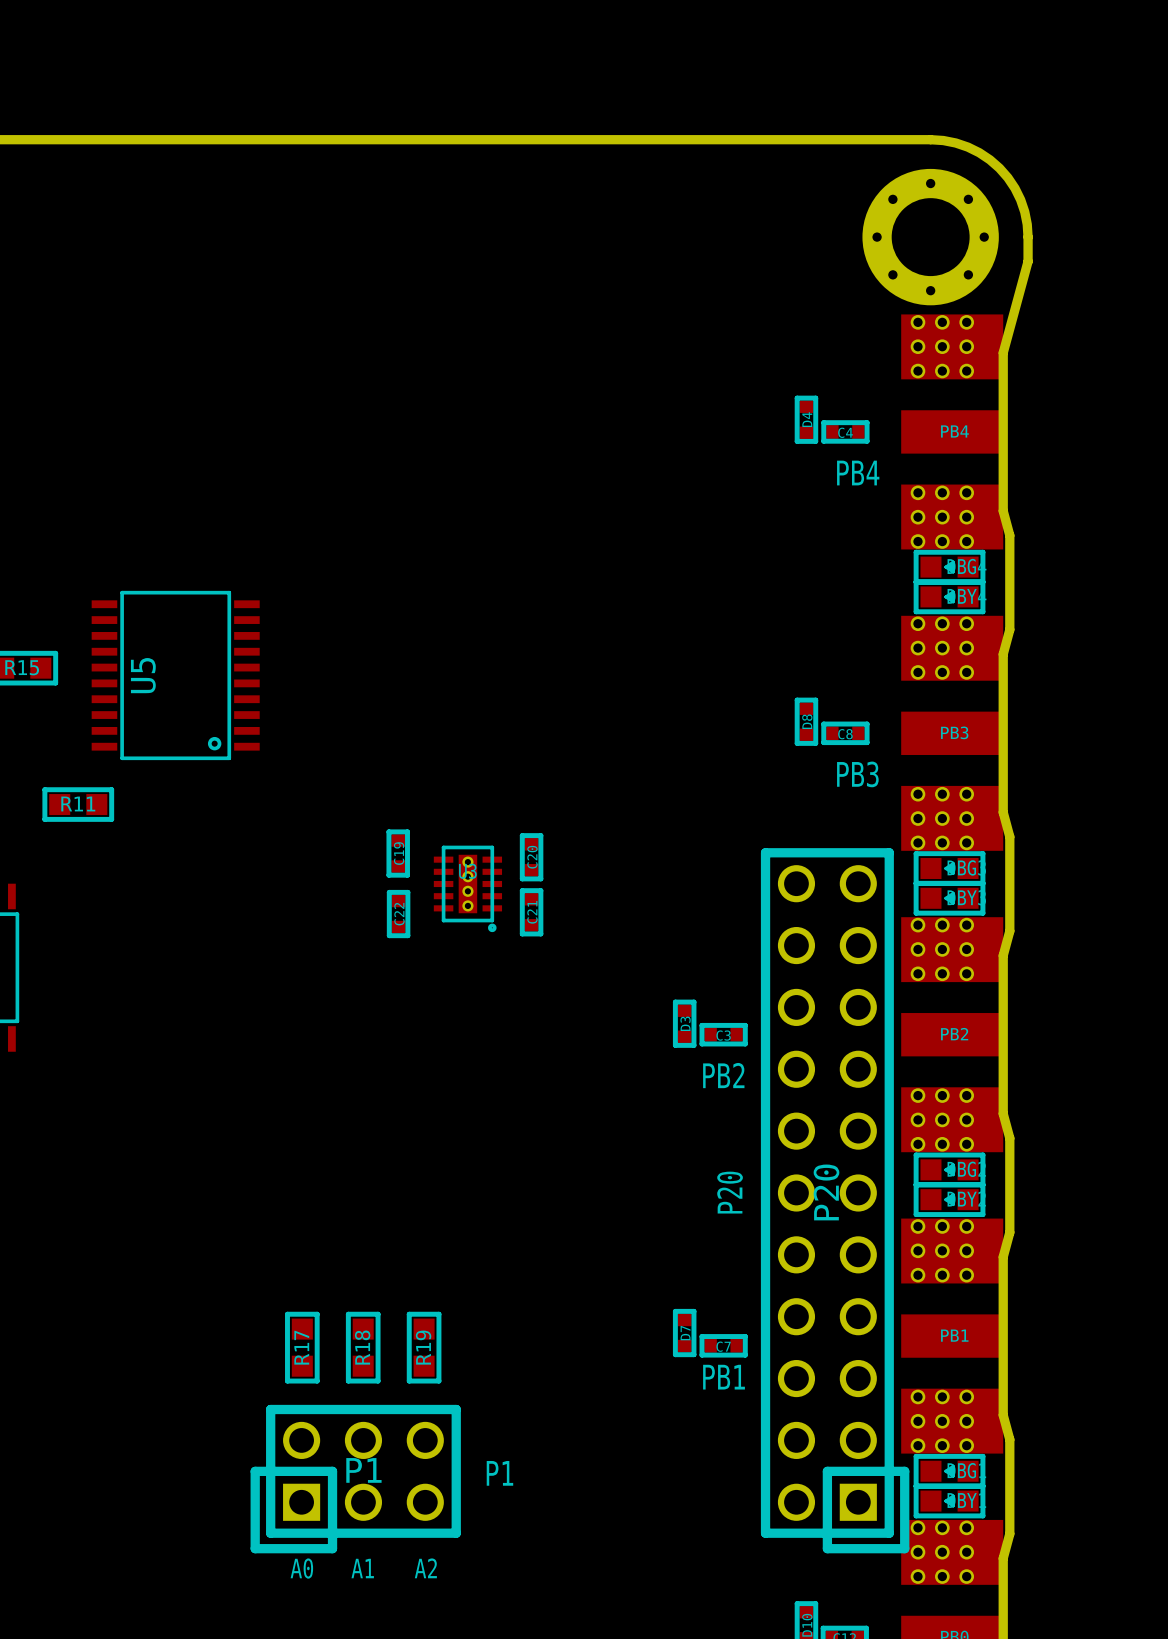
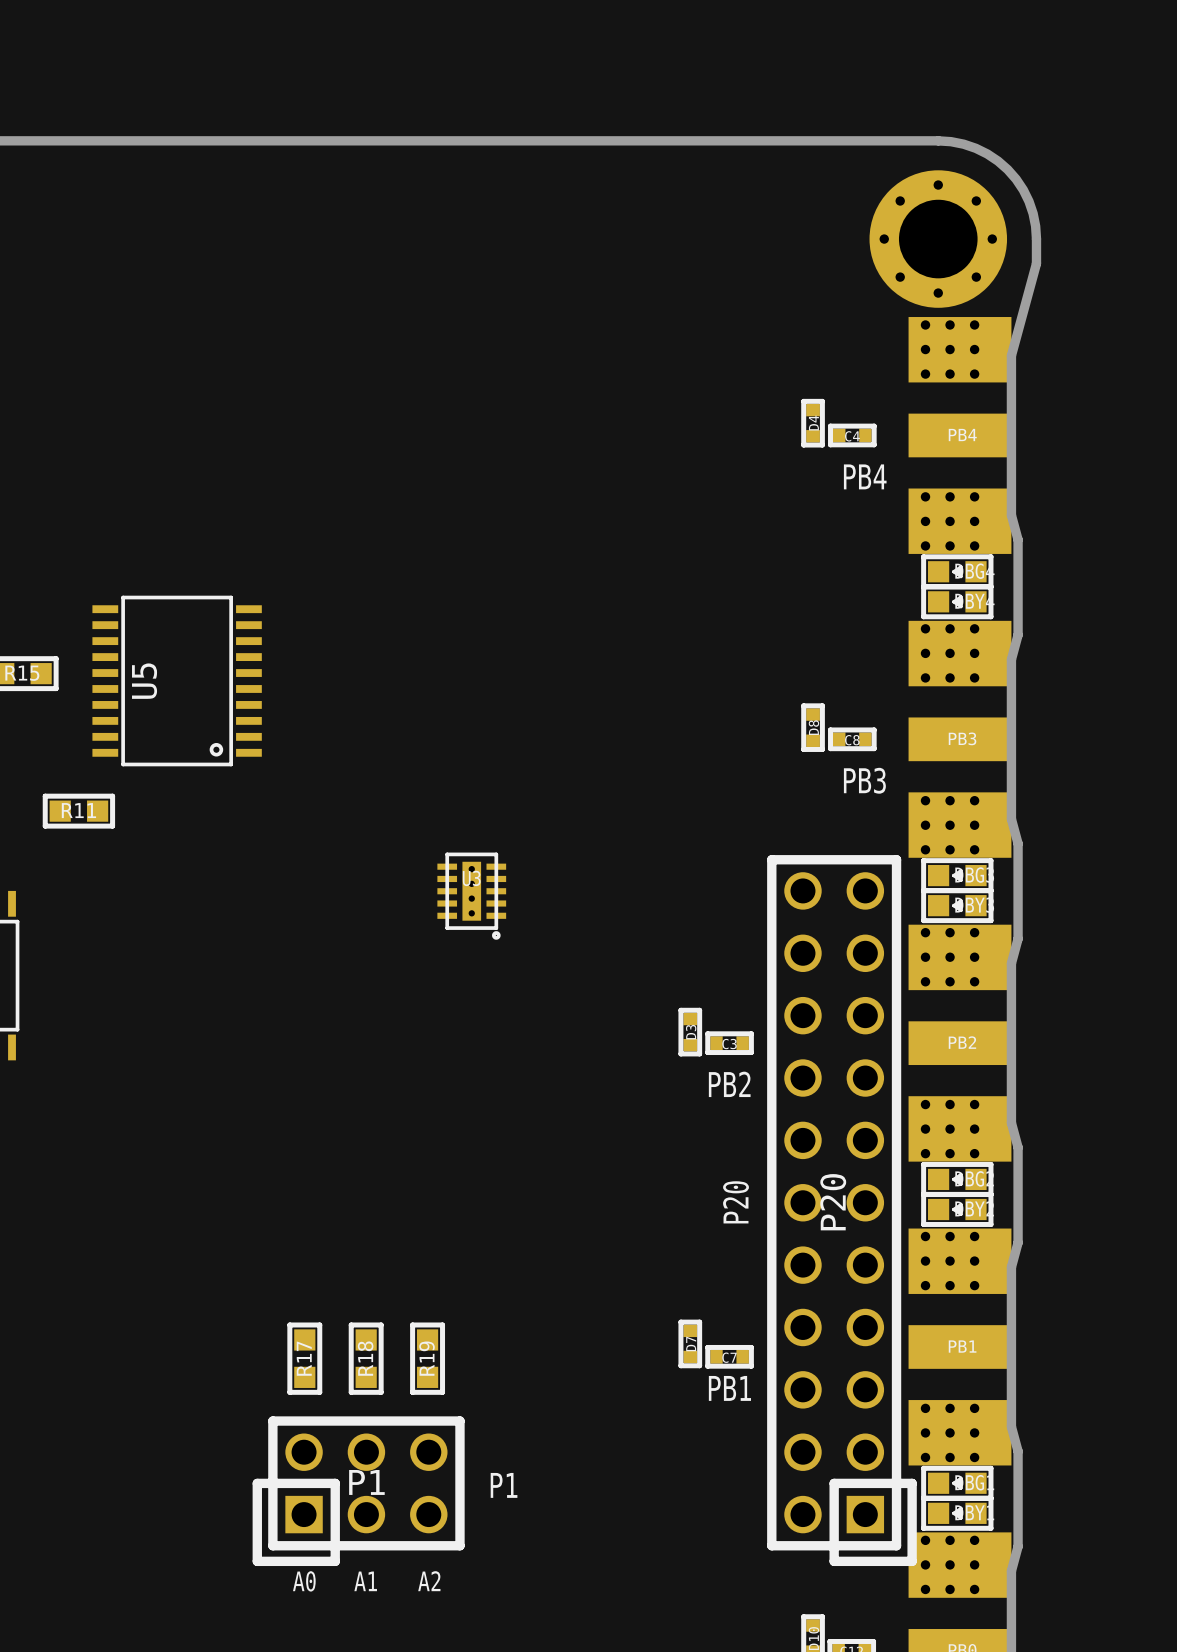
C19: (398, 853) -> none
C20: (531, 857) -> none
C21: (531, 912) -> none
C22: (398, 914) -> none

